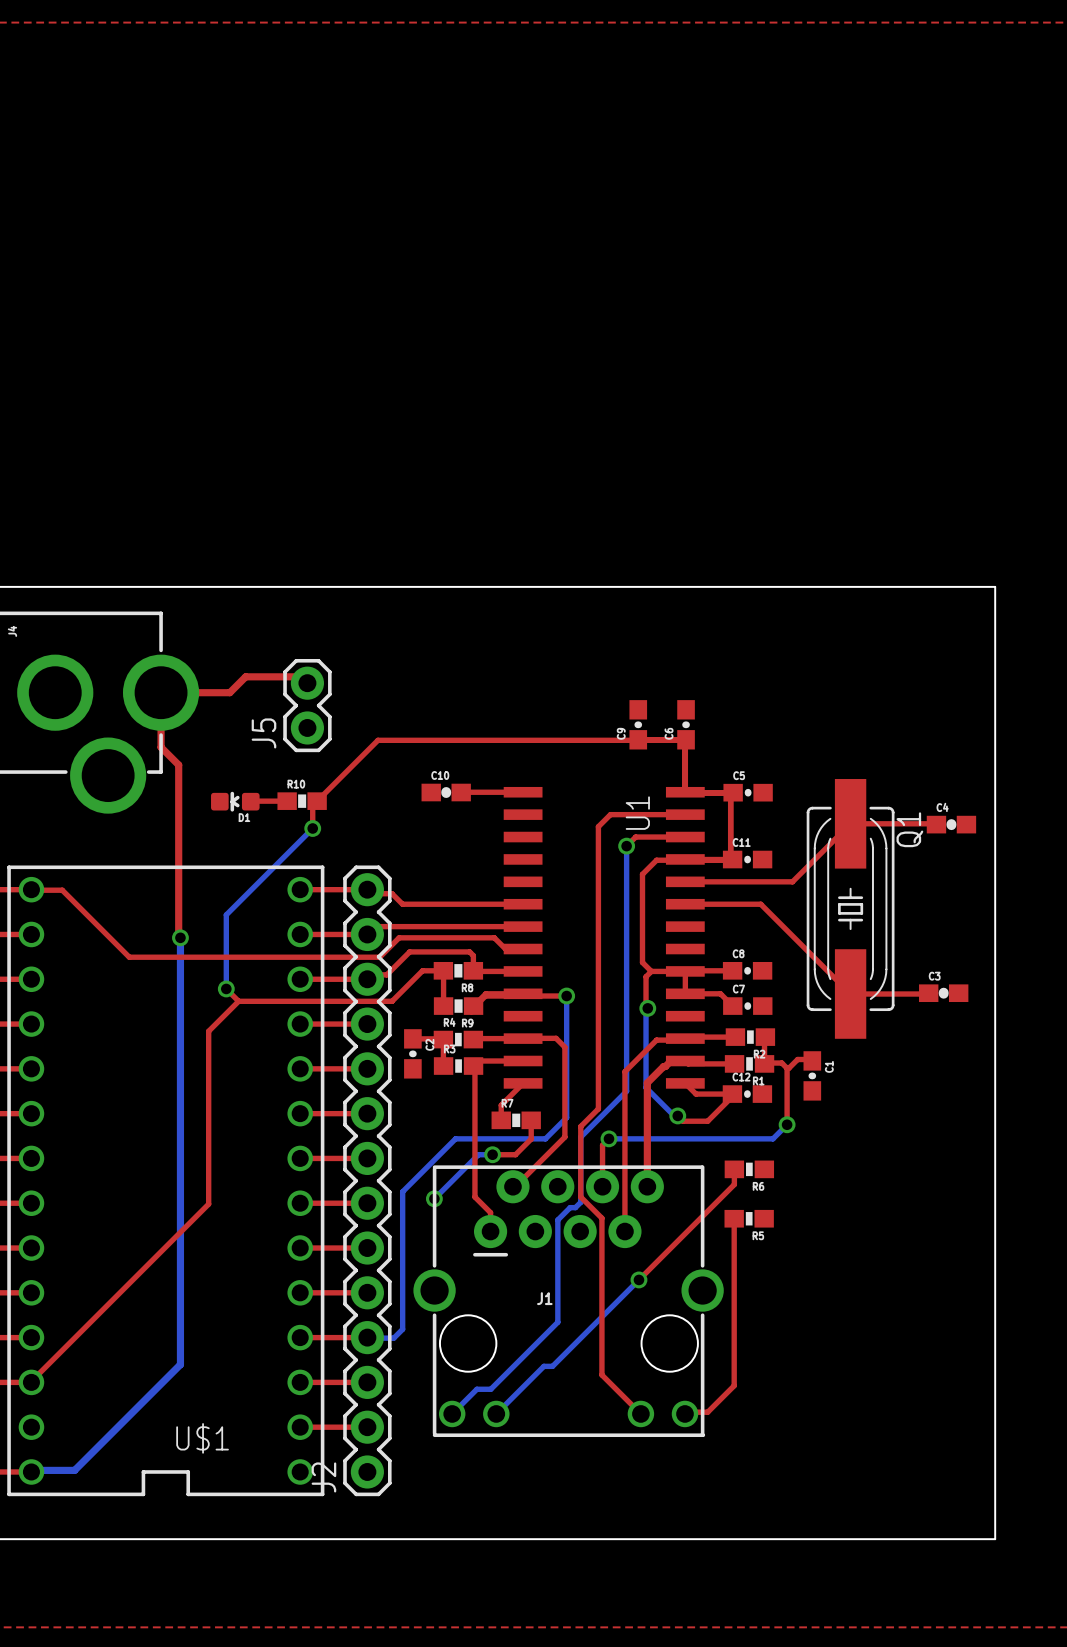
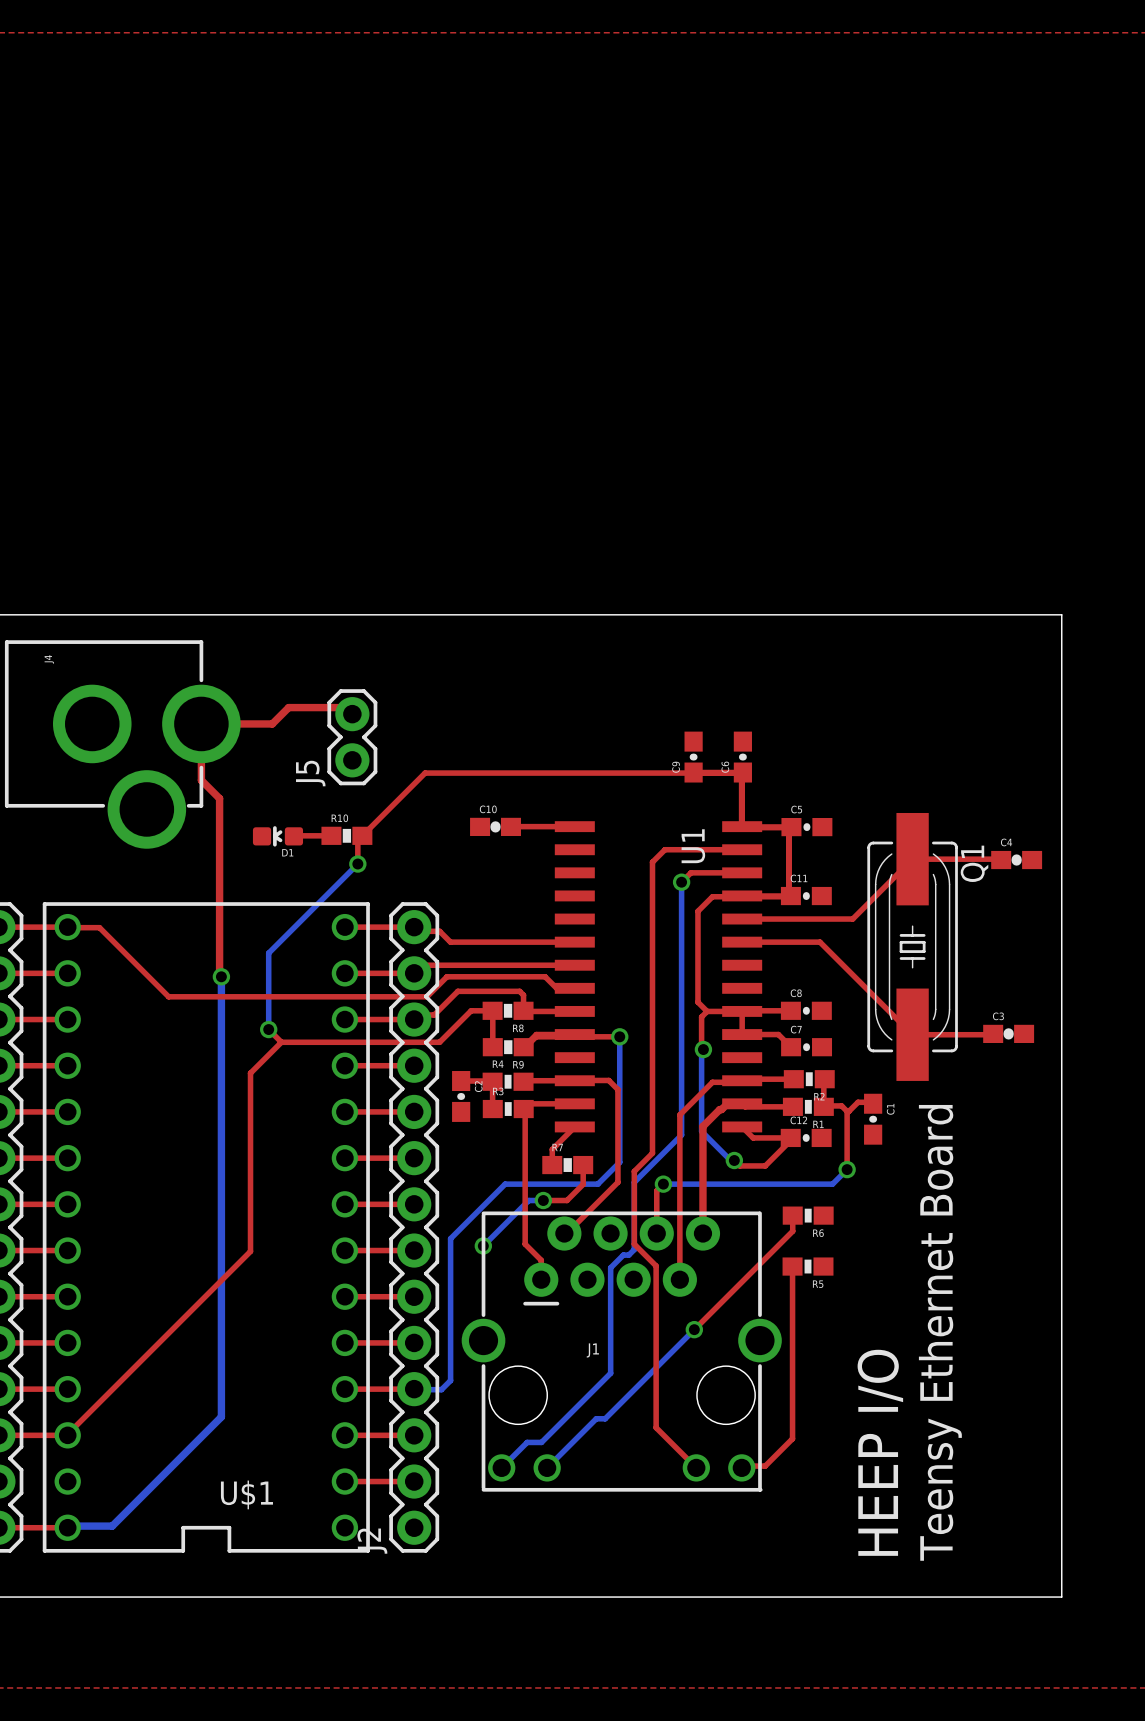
text: none -> Teensy Ethernet Board (940, 1332)
text: none -> HEEP I/O (880, 1452)

